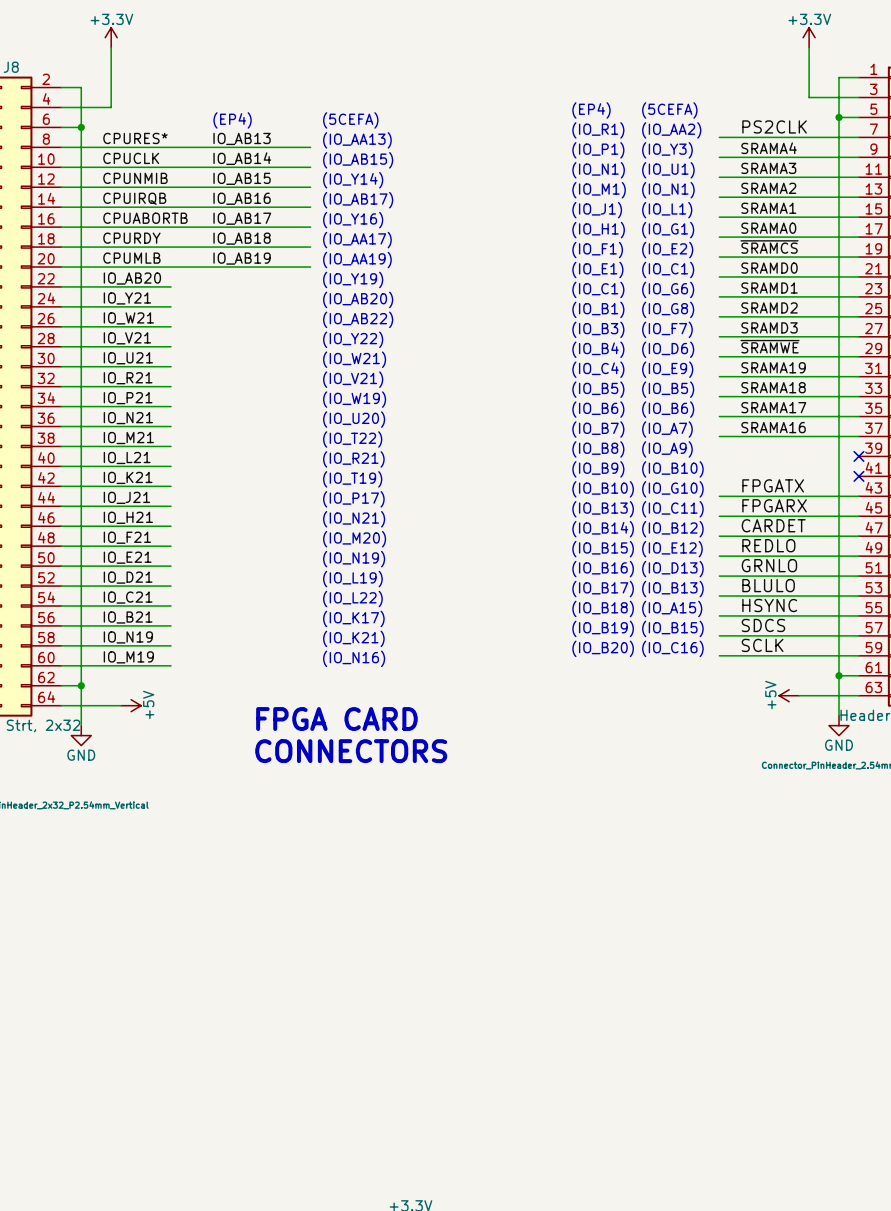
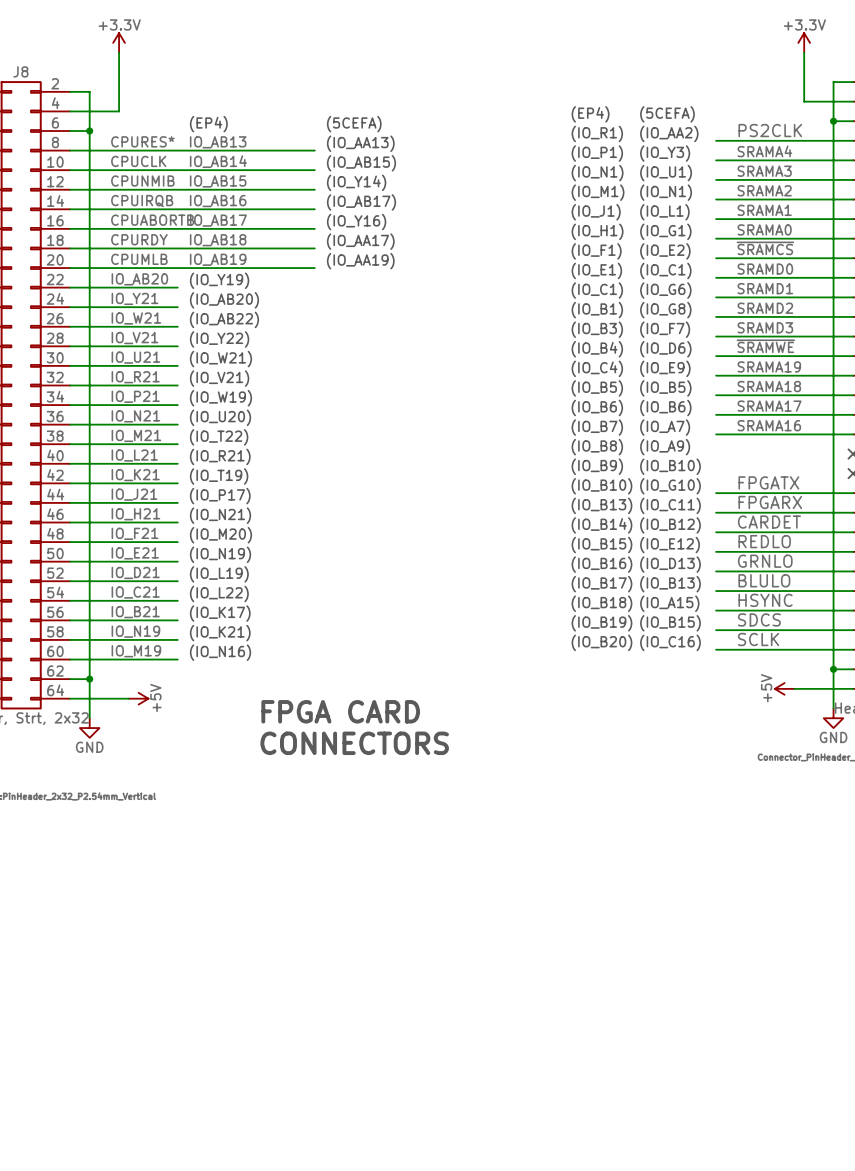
text position: (EP4) (232, 120) -> (EP4) (208, 124)
label position: IO_AB13 (242, 138) -> IO_AB13 (218, 142)
label position: IO_AB14 (242, 158) -> IO_AB14 (218, 161)
label position: IO_AB15 (242, 178) -> IO_AB15 (218, 181)
label position: IO_AB16 (242, 198) -> IO_AB16 (218, 201)
label position: IO_AB17 (242, 218) -> IO_AB17 (218, 220)
label position: IO_AB18 (242, 238) -> IO_AB18 (218, 240)
label position: IO_AB19 (242, 258) -> IO_AB19 (218, 259)
text position: (IO_Y19) (353, 279) -> (IO_Y19) (219, 280)
text position: (IO_AB20) (358, 299) -> (IO_AB20) (224, 300)
text position: (IO_AB22) (358, 319) -> (IO_AB22) (224, 319)
text position: (IO_Y22) (353, 339) -> (IO_Y22) (219, 339)
text position: (IO_W21) (354, 359) -> (IO_W21) (220, 359)
text position: (IO_V21) (353, 379) -> (IO_V21) (219, 378)
text position: (IO_W19) (354, 399) -> (IO_W19) (220, 398)
text position: (IO_U20) (354, 419) -> (IO_U20) (220, 417)
text position: (IO_T22) (352, 439) -> (IO_T22) (219, 437)
text position: (IO_R21) (353, 459) -> (IO_R21) (220, 456)
text position: (IO_T19) (352, 479) -> (IO_T19) (219, 476)
text position: (IO_P17) (353, 499) -> (IO_P17) (220, 496)
text position: (IO_N21) (354, 519) -> (IO_N21) (220, 515)
text position: (IO_M20) (354, 539) -> (IO_M20) (220, 535)
text position: (IO_N19) (354, 559) -> (IO_N19) (220, 554)
text position: (IO_L19) (352, 579) -> (IO_L19) (219, 574)
text position: (IO_L22) (352, 599) -> (IO_L22) (219, 593)
text position: (IO_K17) (353, 618) -> (IO_K17) (220, 613)
text position: (IO_K21) (353, 638) -> (IO_K21) (220, 633)
text position: (IO_N16) (354, 658) -> (IO_N16) (220, 652)

